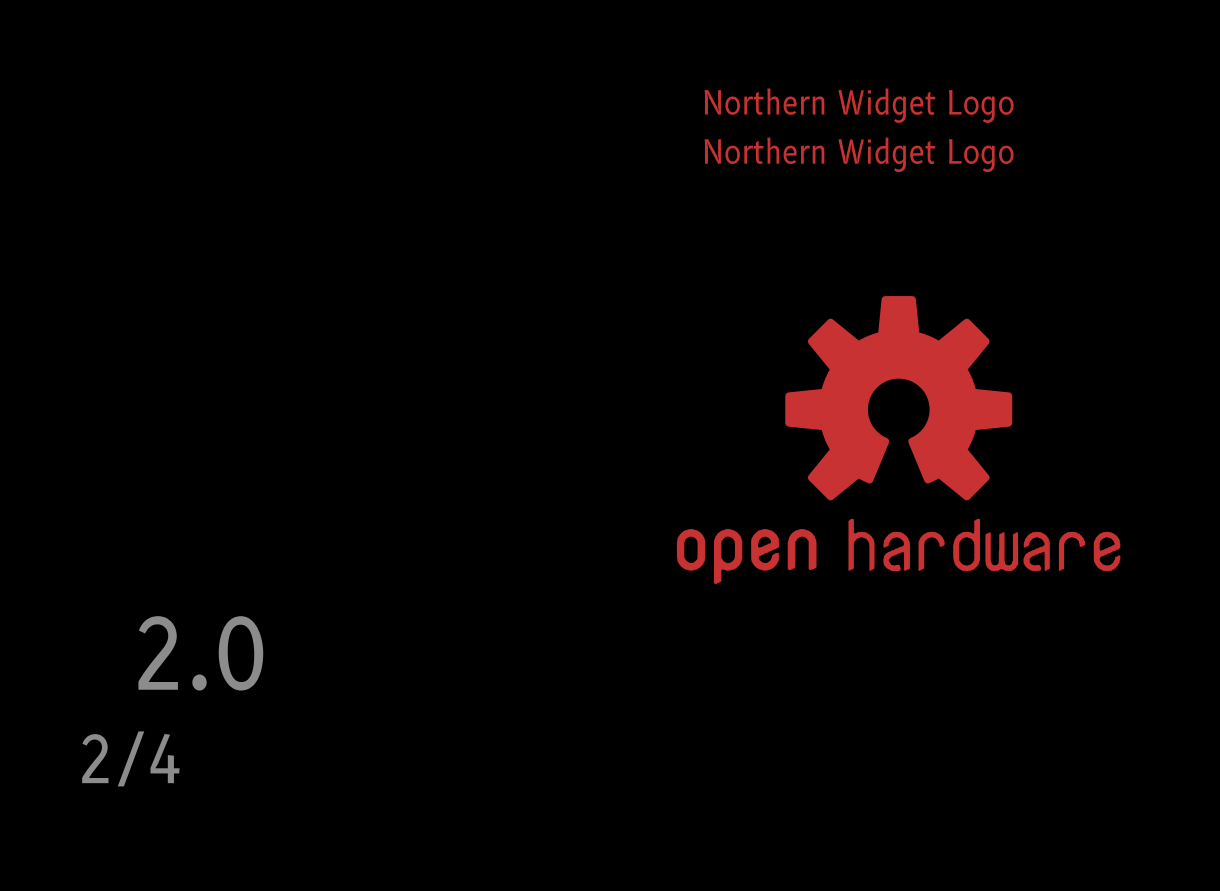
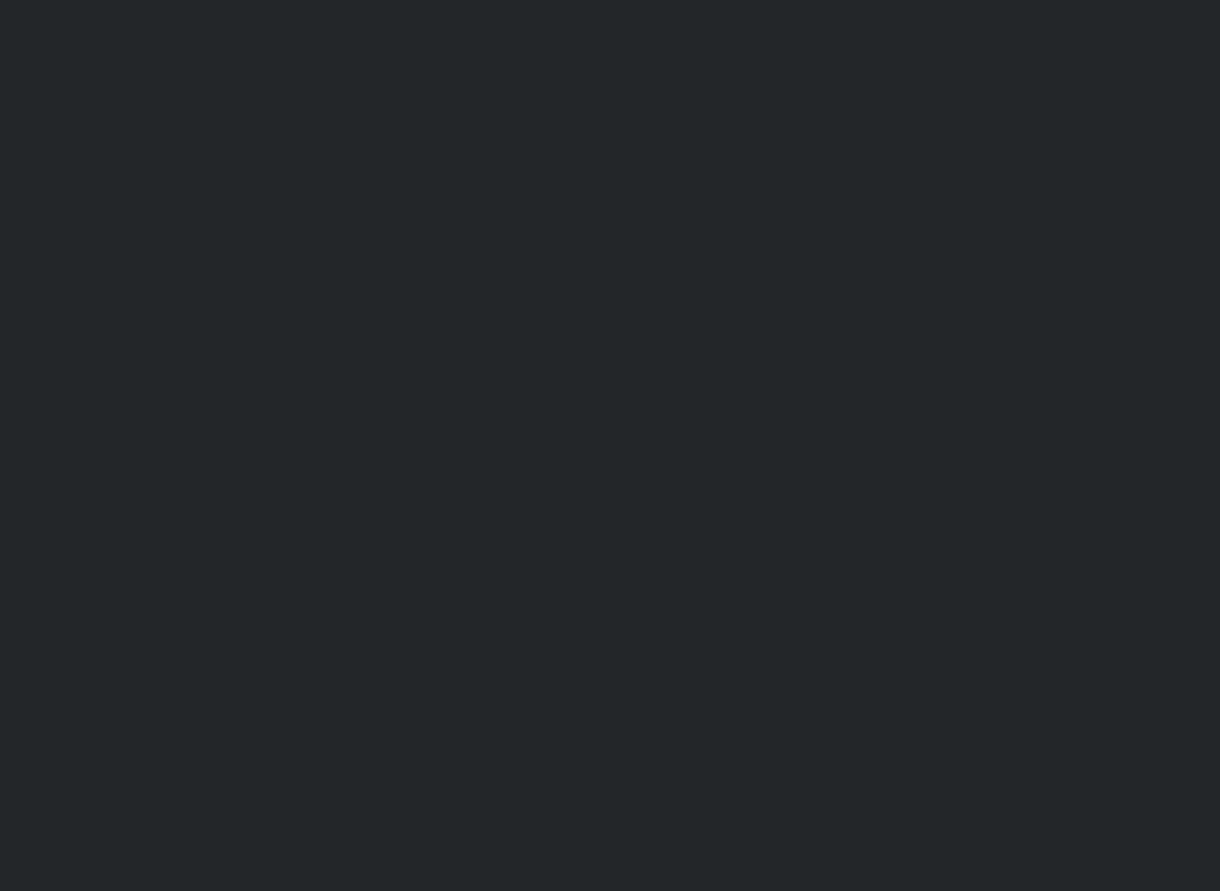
part: (859, 105) -> none
part: (859, 154) -> none
part: (898, 439) -> none
text: 2.0 (200, 653) -> none
text: 2/4 (130, 758) -> none

